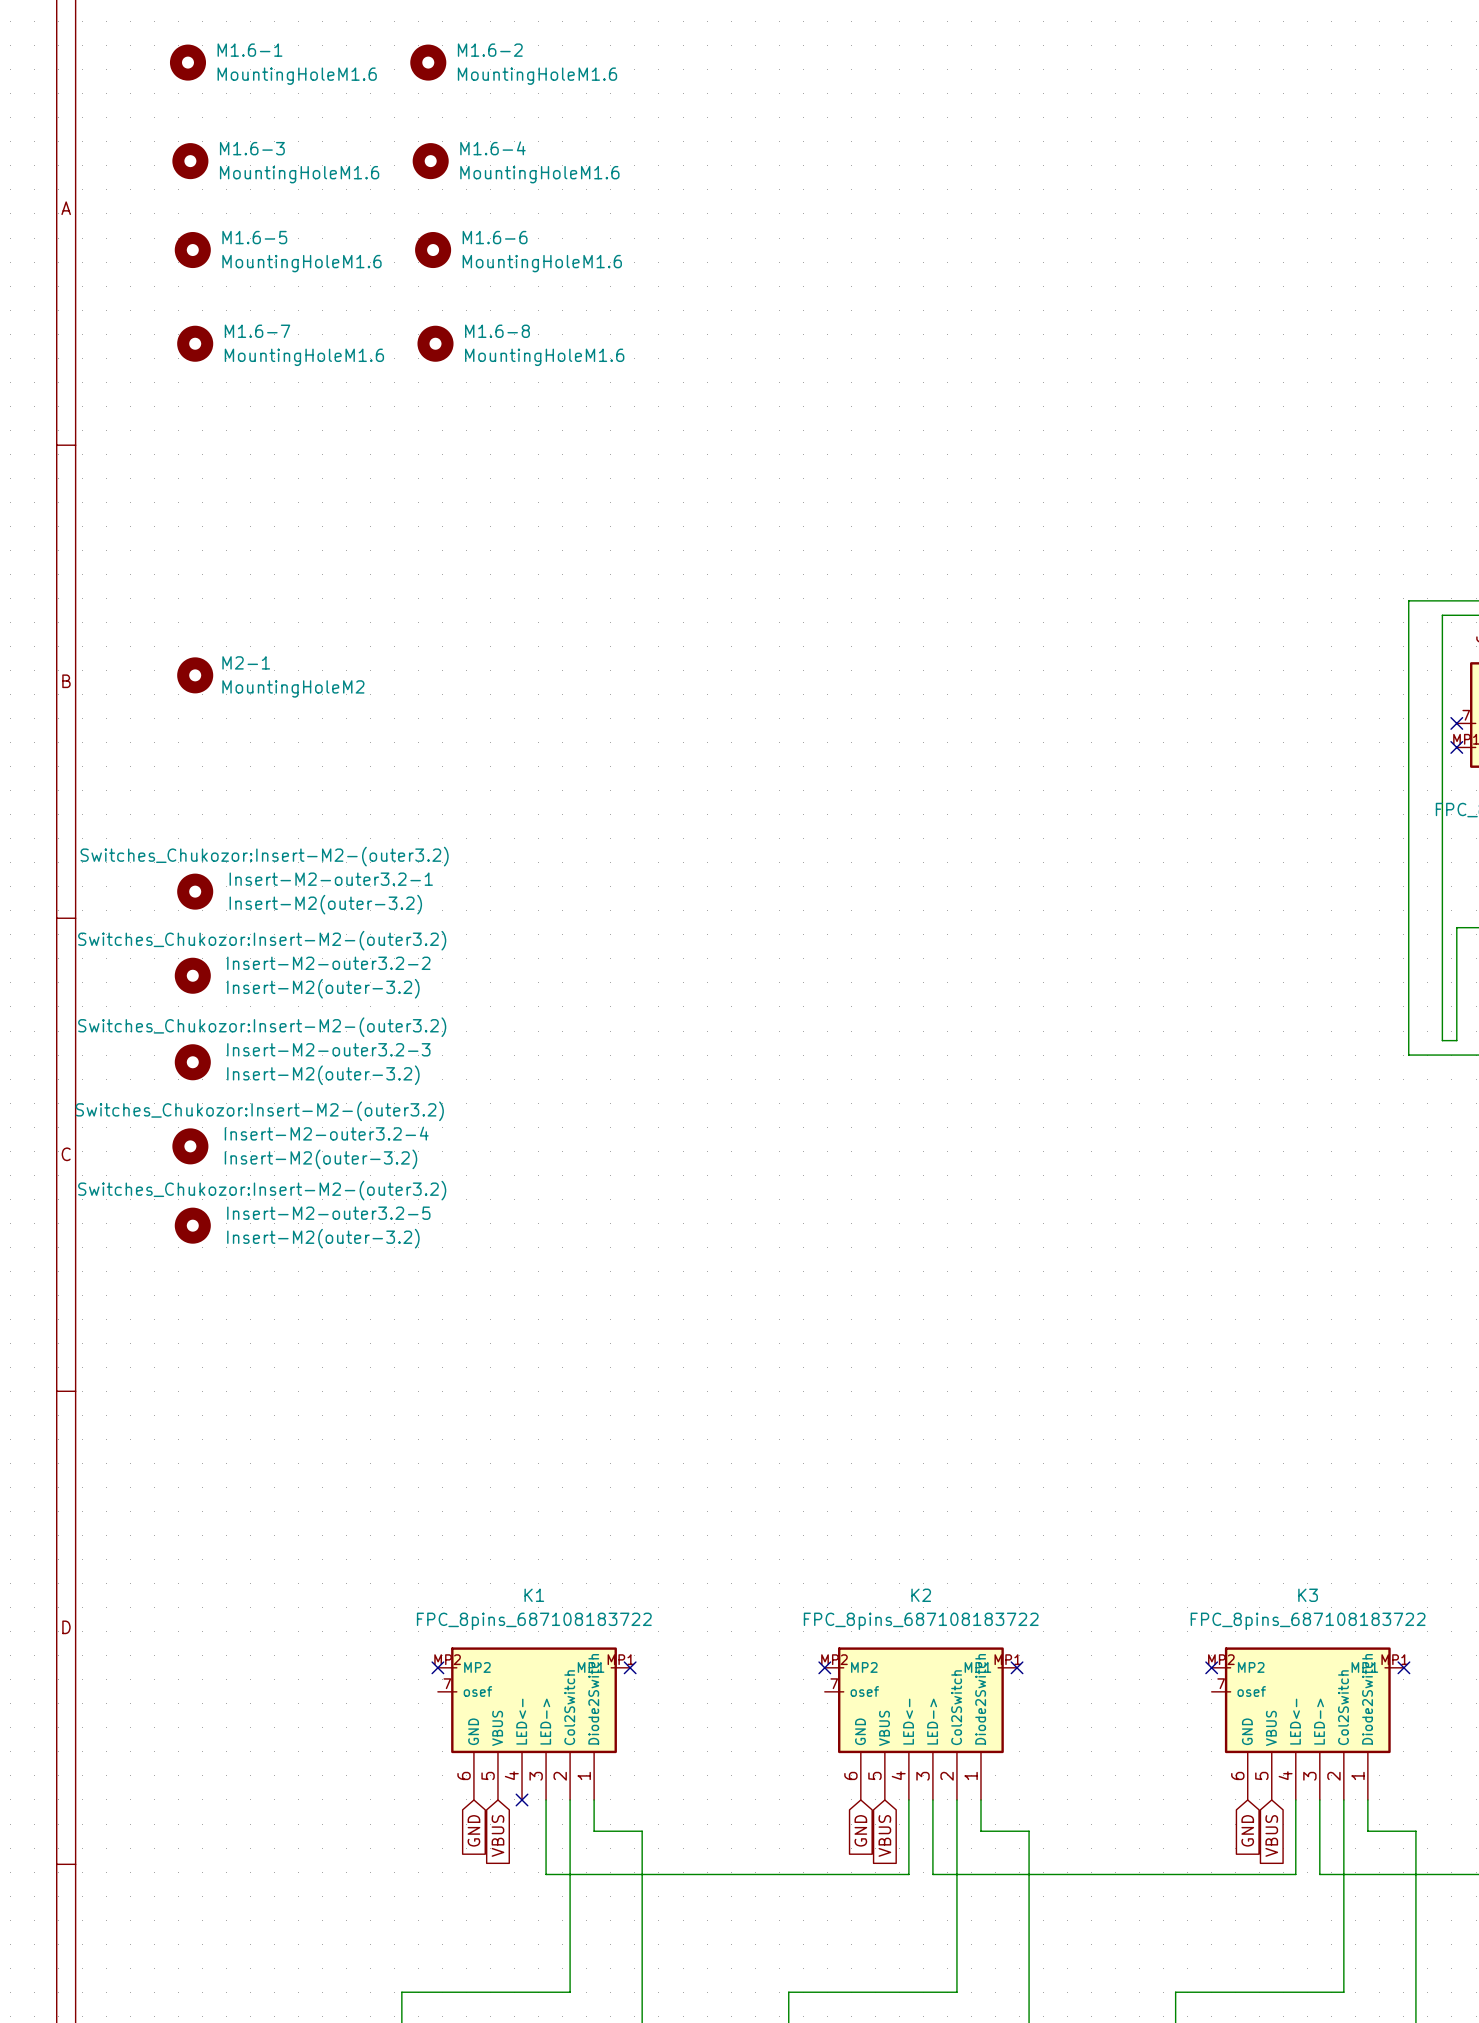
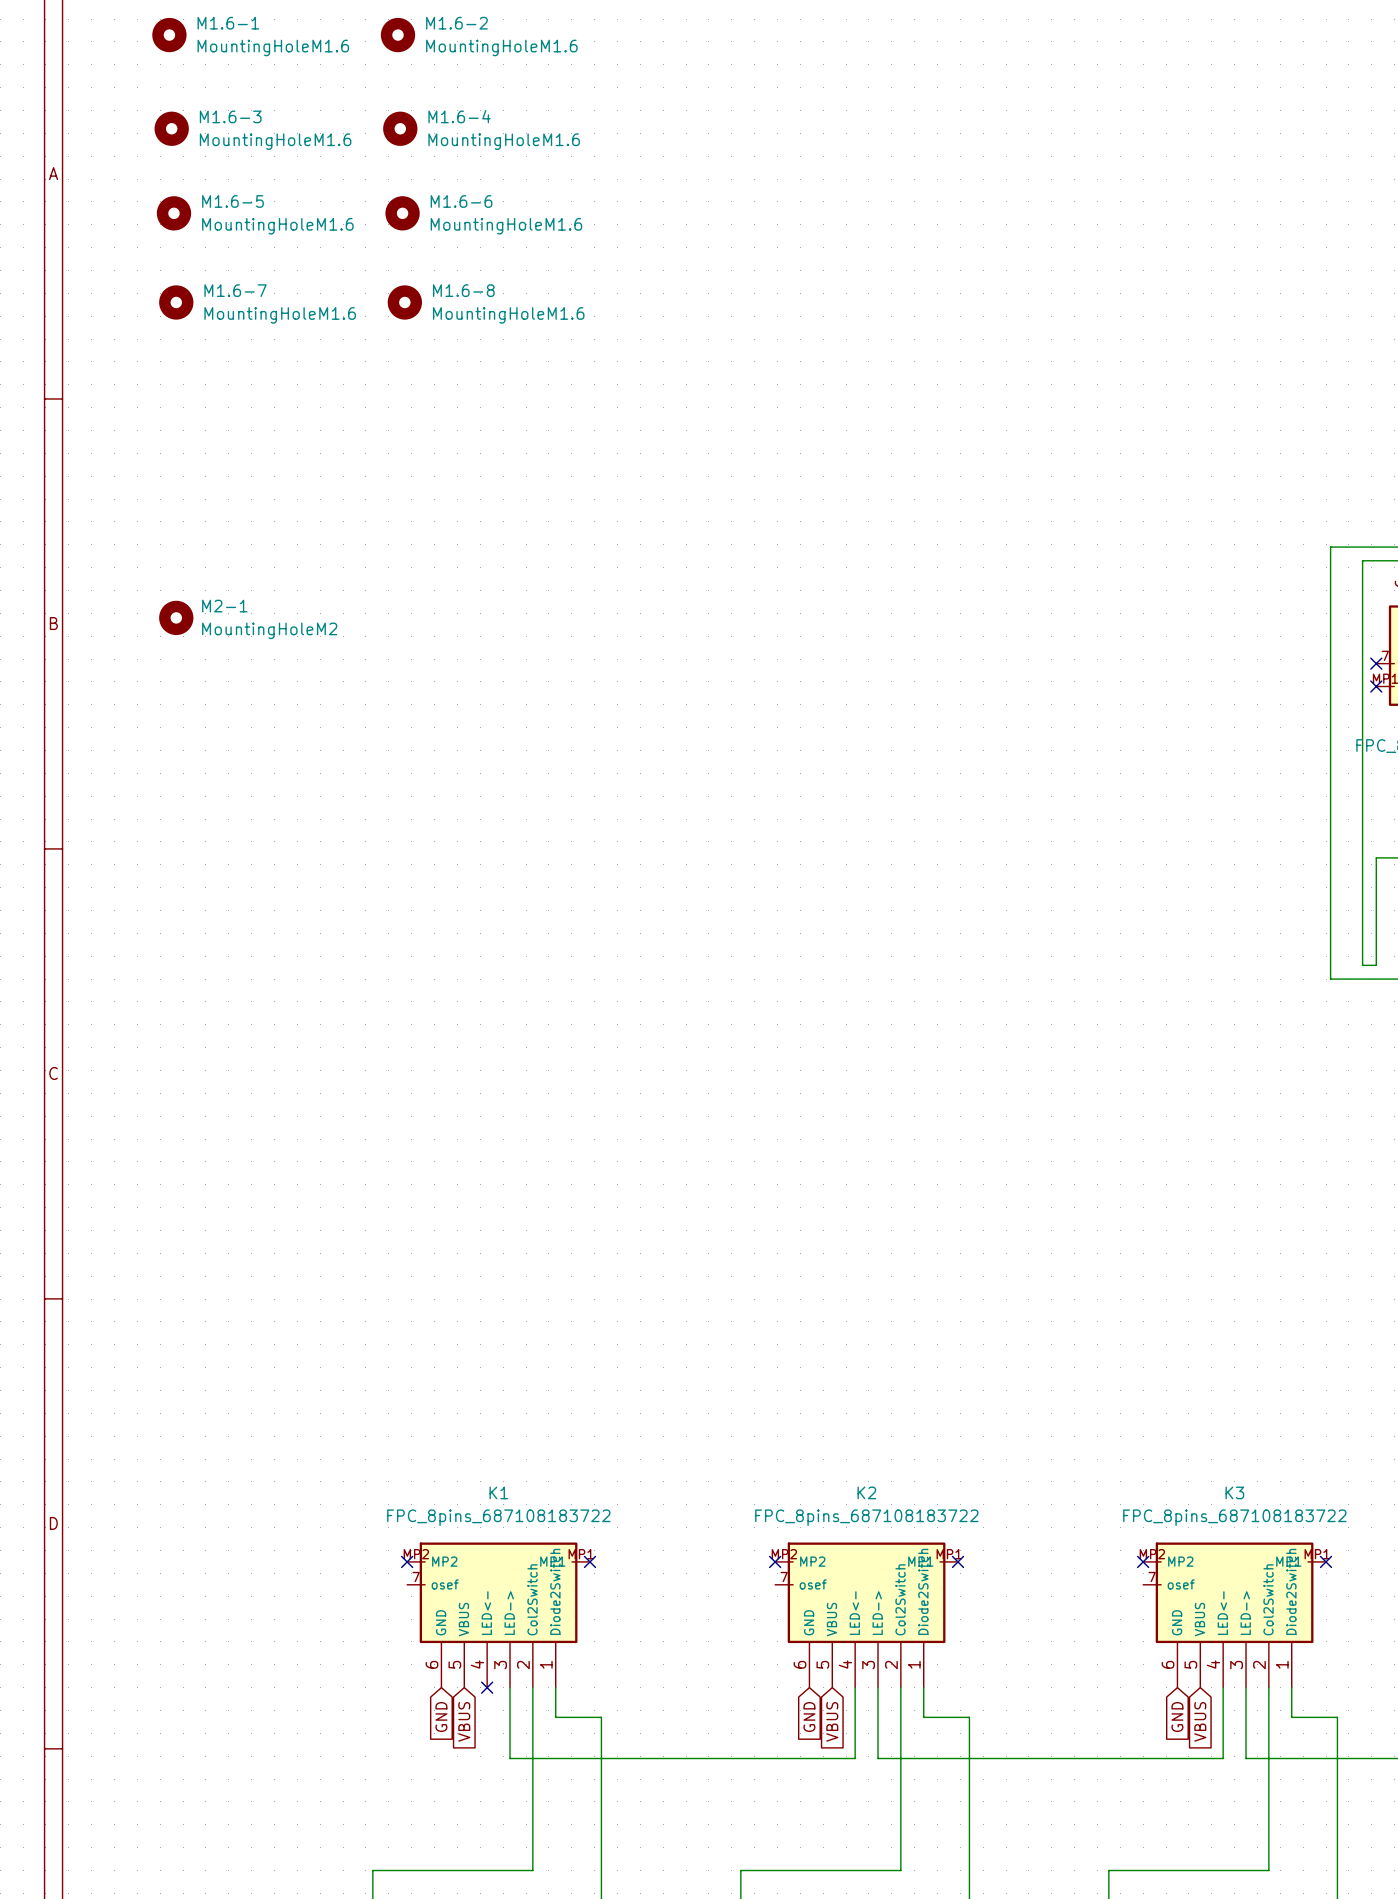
Insert-M2-outer3.2-1: Insert-M2(outer-3.2) (195, 891) -> none
Insert-M2-outer3.2-2: Insert-M2(outer-3.2) (192, 975) -> none
Insert-M2-outer3.2-3: Insert-M2(outer-3.2) (192, 1062) -> none
Insert-M2-outer3.2-4: Insert-M2(outer-3.2) (190, 1146) -> none
Insert-M2-outer3.2-5: Insert-M2(outer-3.2) (192, 1225) -> none

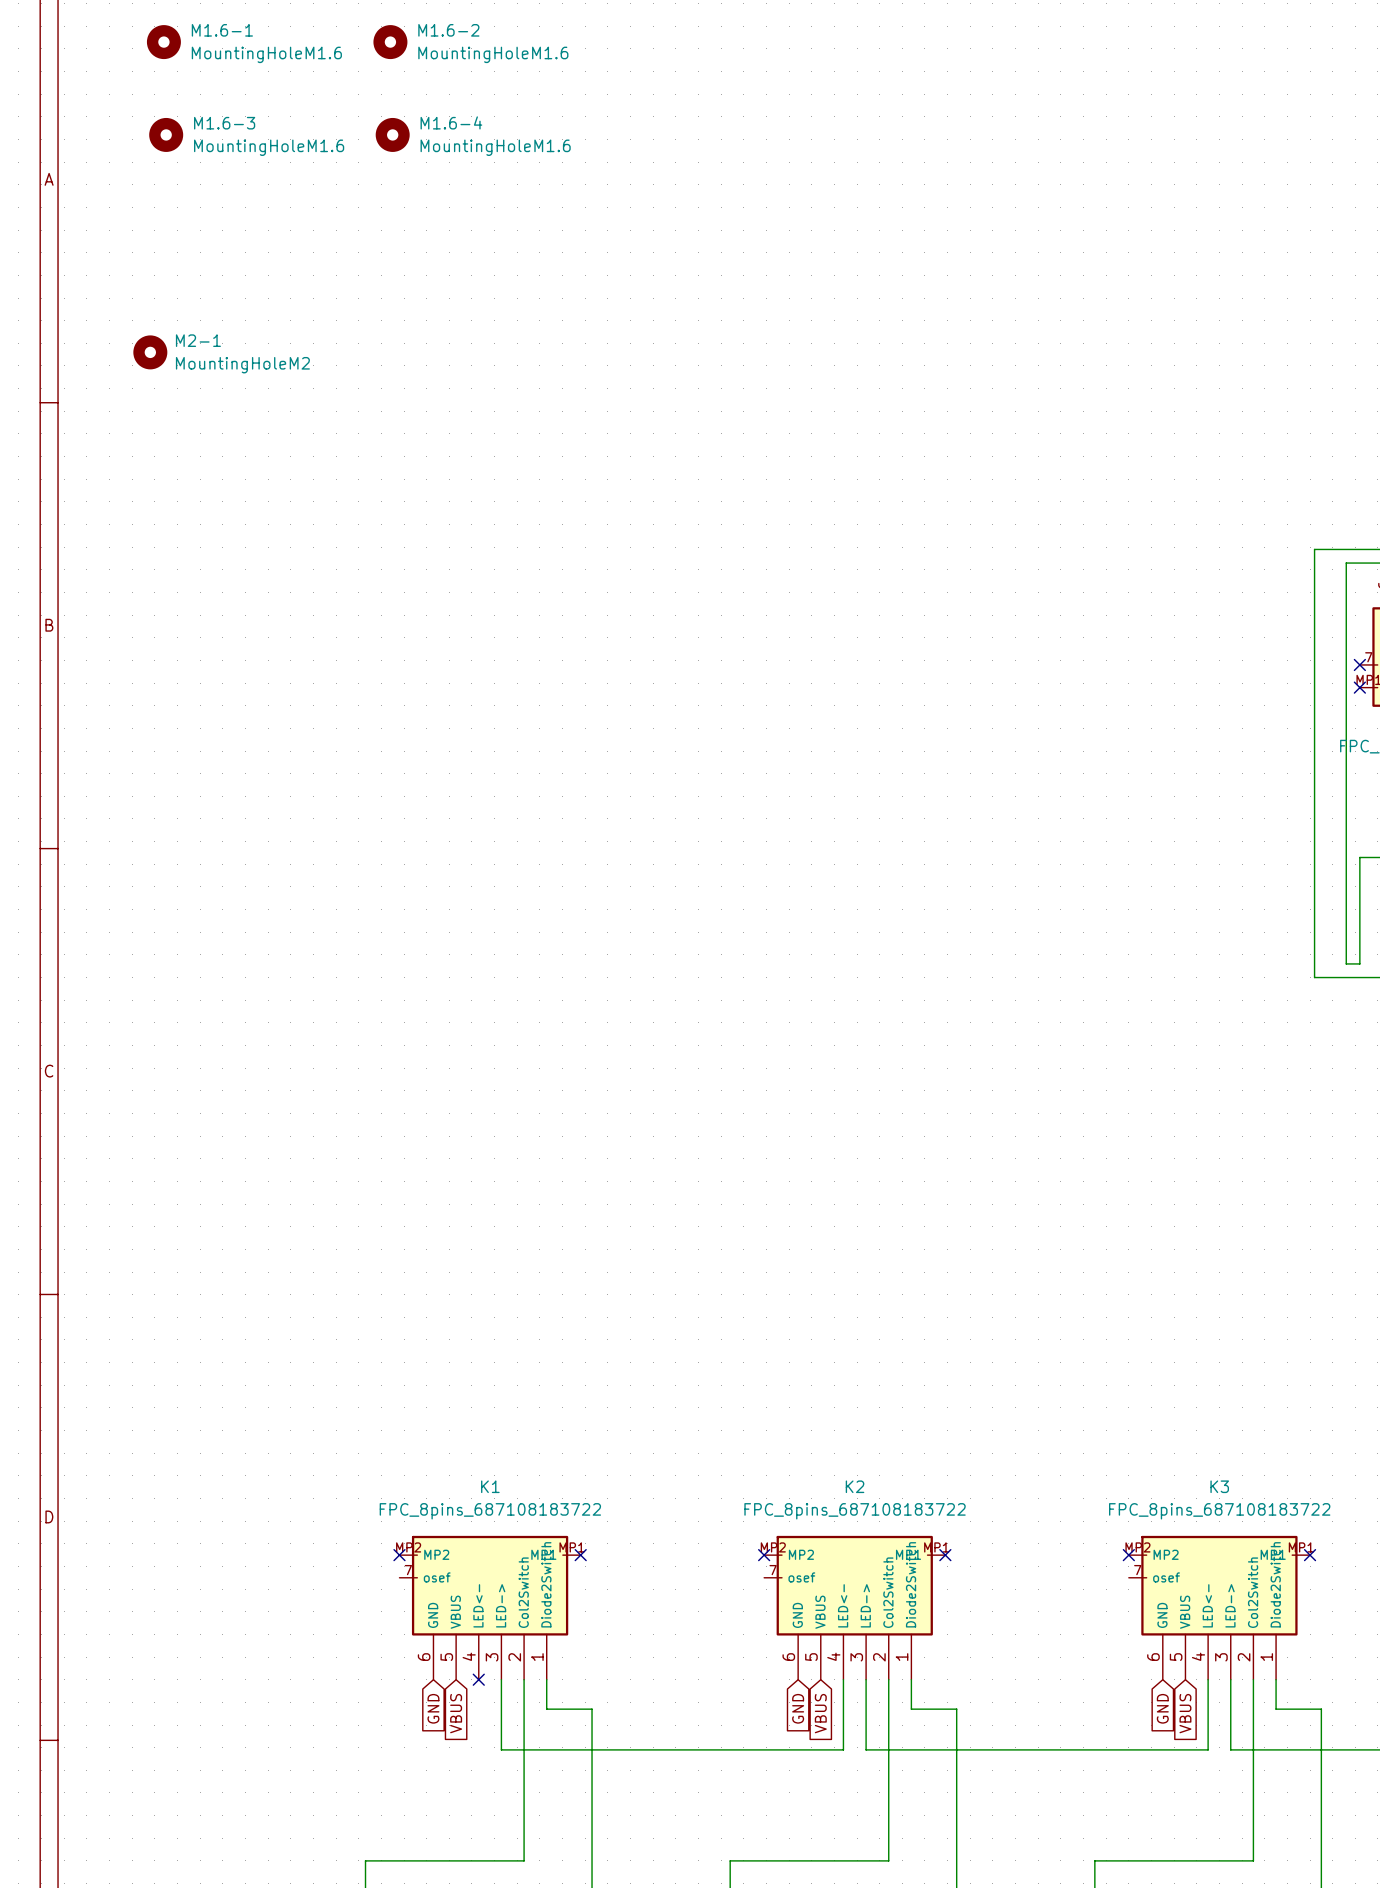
M1.6-5: MountingHoleM1.6 (173, 213) -> none
M1.6-6: MountingHoleM1.6 (402, 213) -> none
M1.6-7: MountingHoleM1.6 (176, 302) -> none
M1.6-8: MountingHoleM1.6 (404, 302) -> none
M2-1 position: (176, 617) -> (150, 352)

